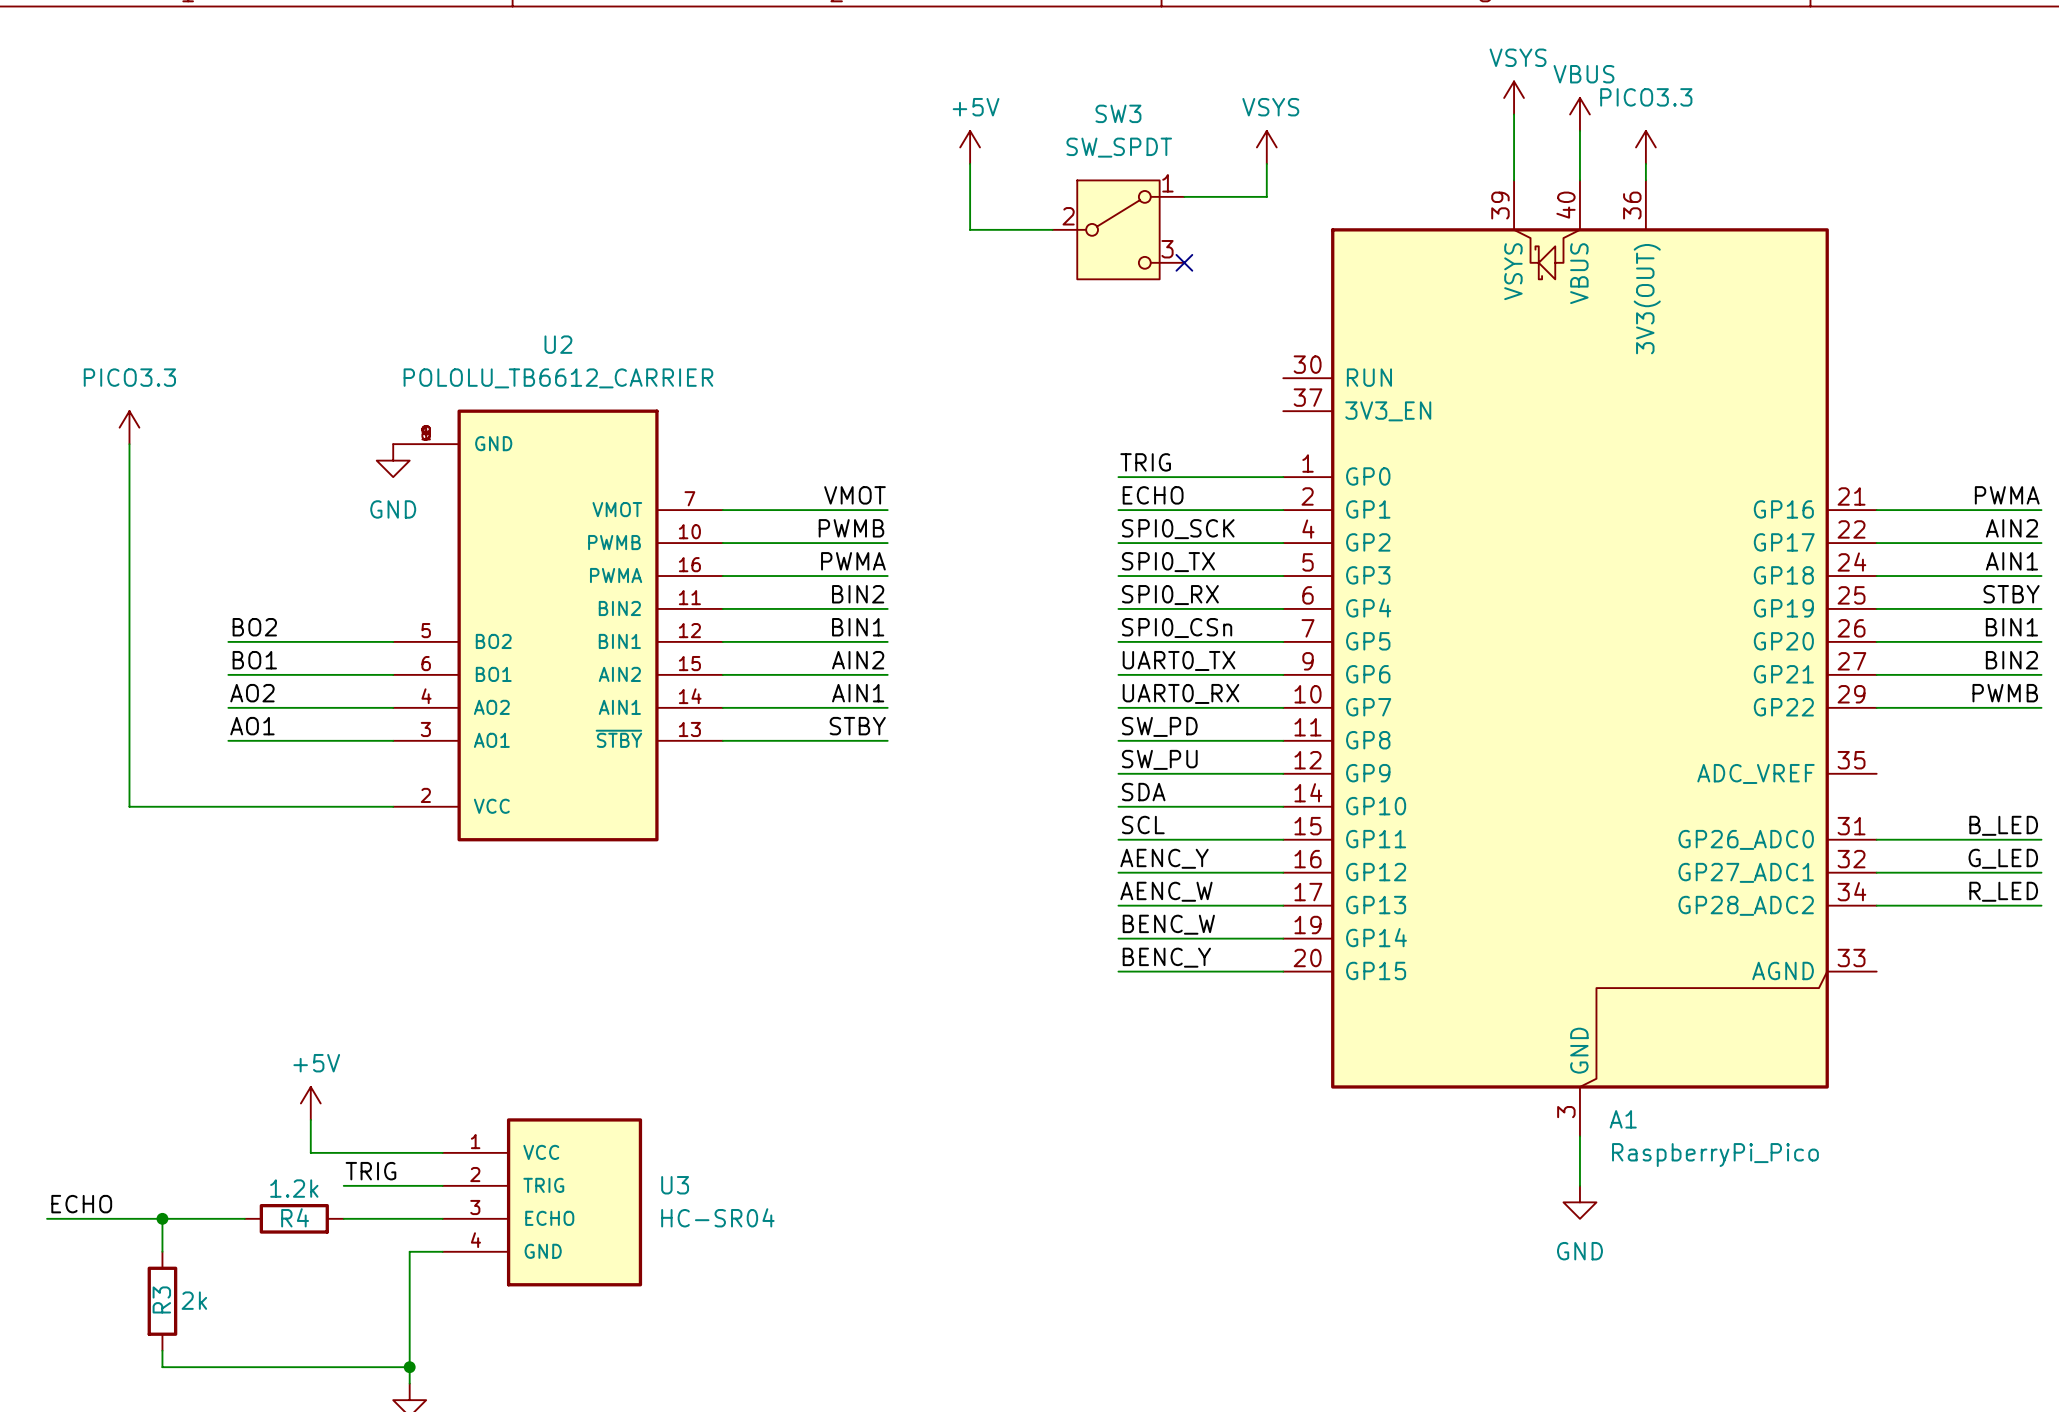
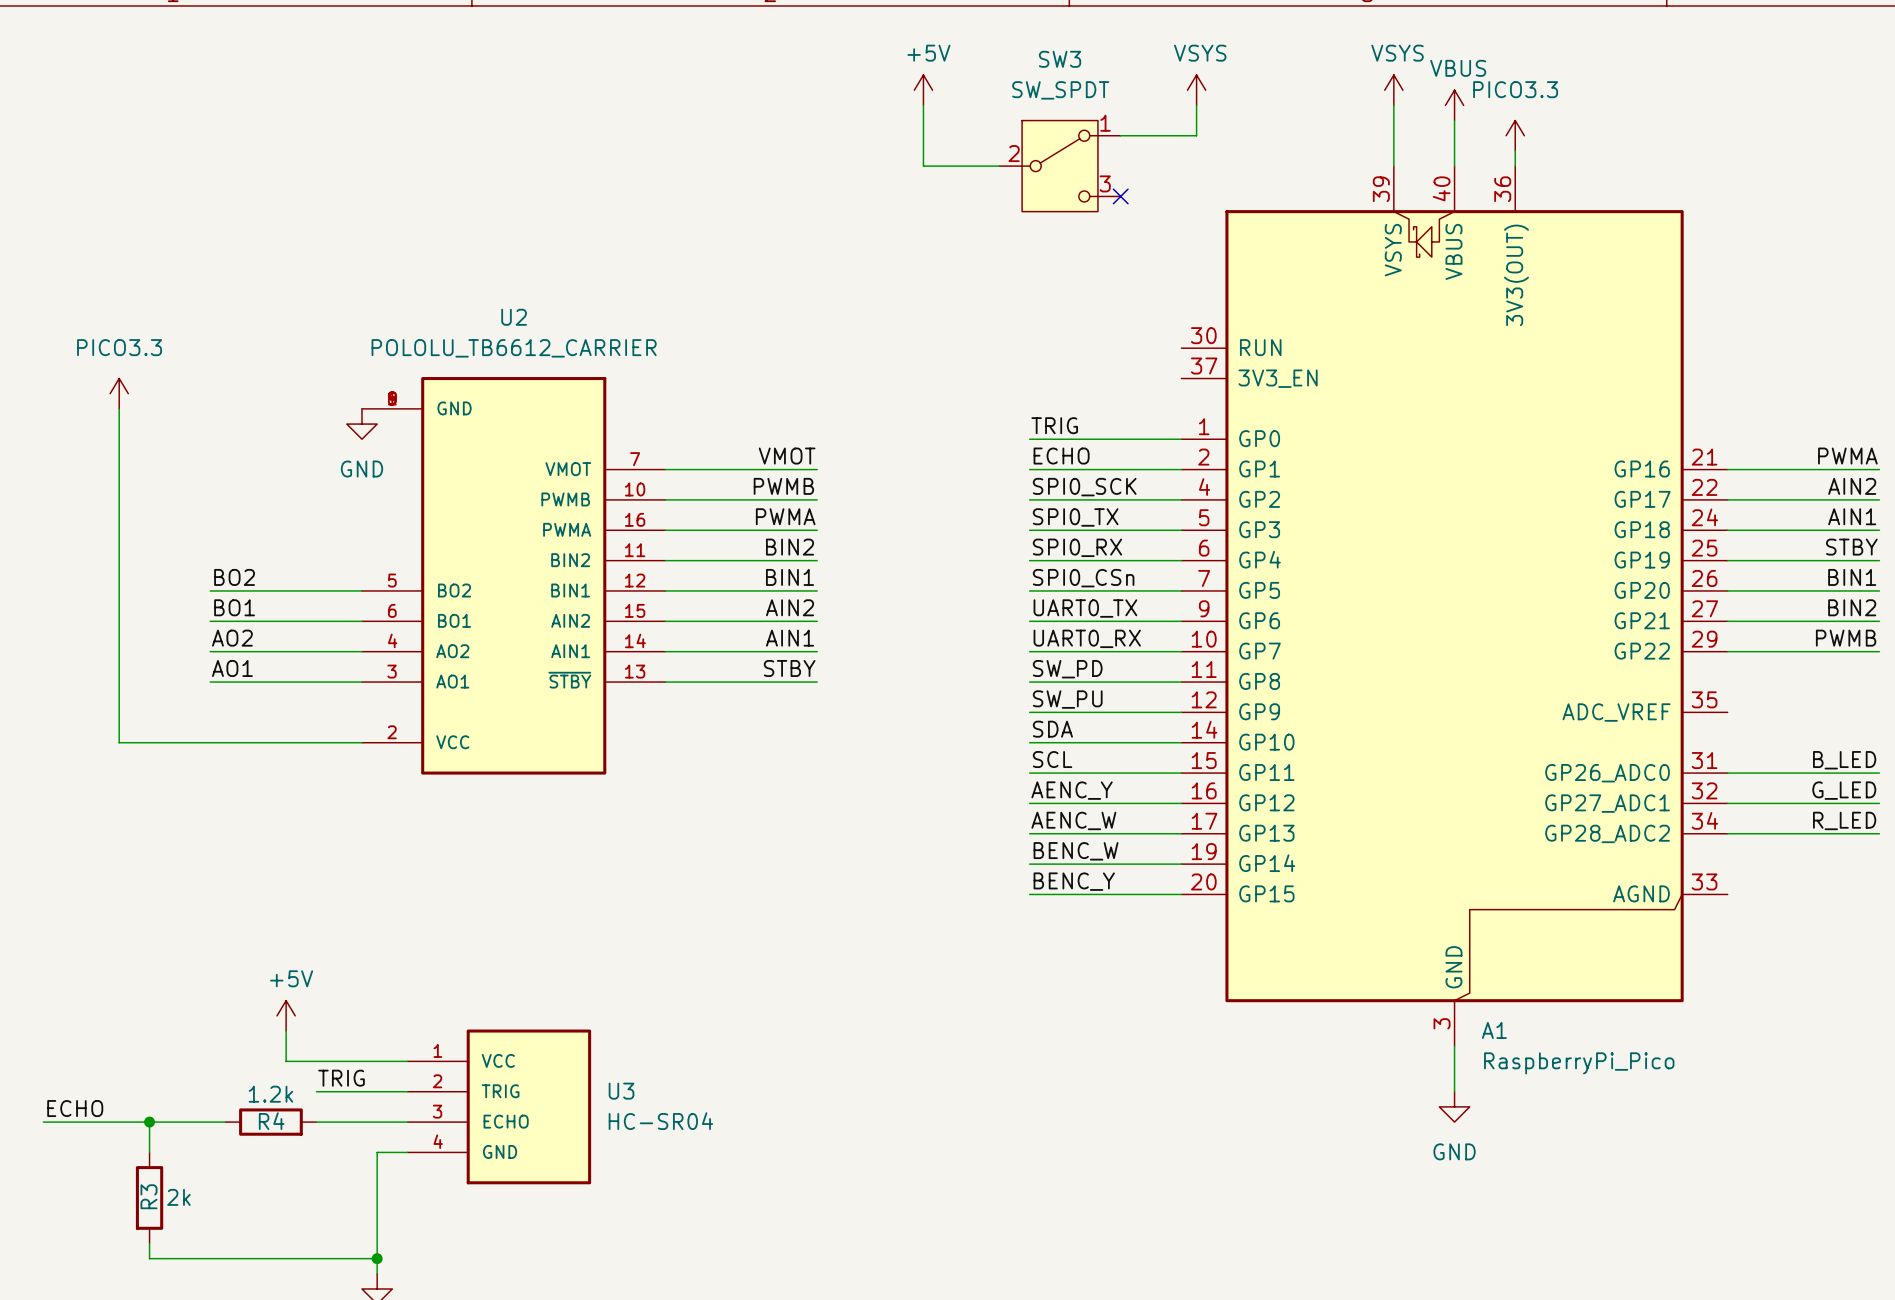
power symbol position: +5V (970, 147) -> +5V (923, 90)
power symbol position: VSYS (1266, 147) -> VSYS (1196, 90)
wire: (970, 163) (970, 229) (1052, 229) -> (923, 105) (923, 166) (999, 166)
wire: (1266, 163) (1266, 196) (1184, 196) -> (1196, 105) (1196, 135) (1120, 135)
SW3 position: (1118, 229) -> (1060, 166)
no-connect mark position: (1184, 262) -> (1120, 196)

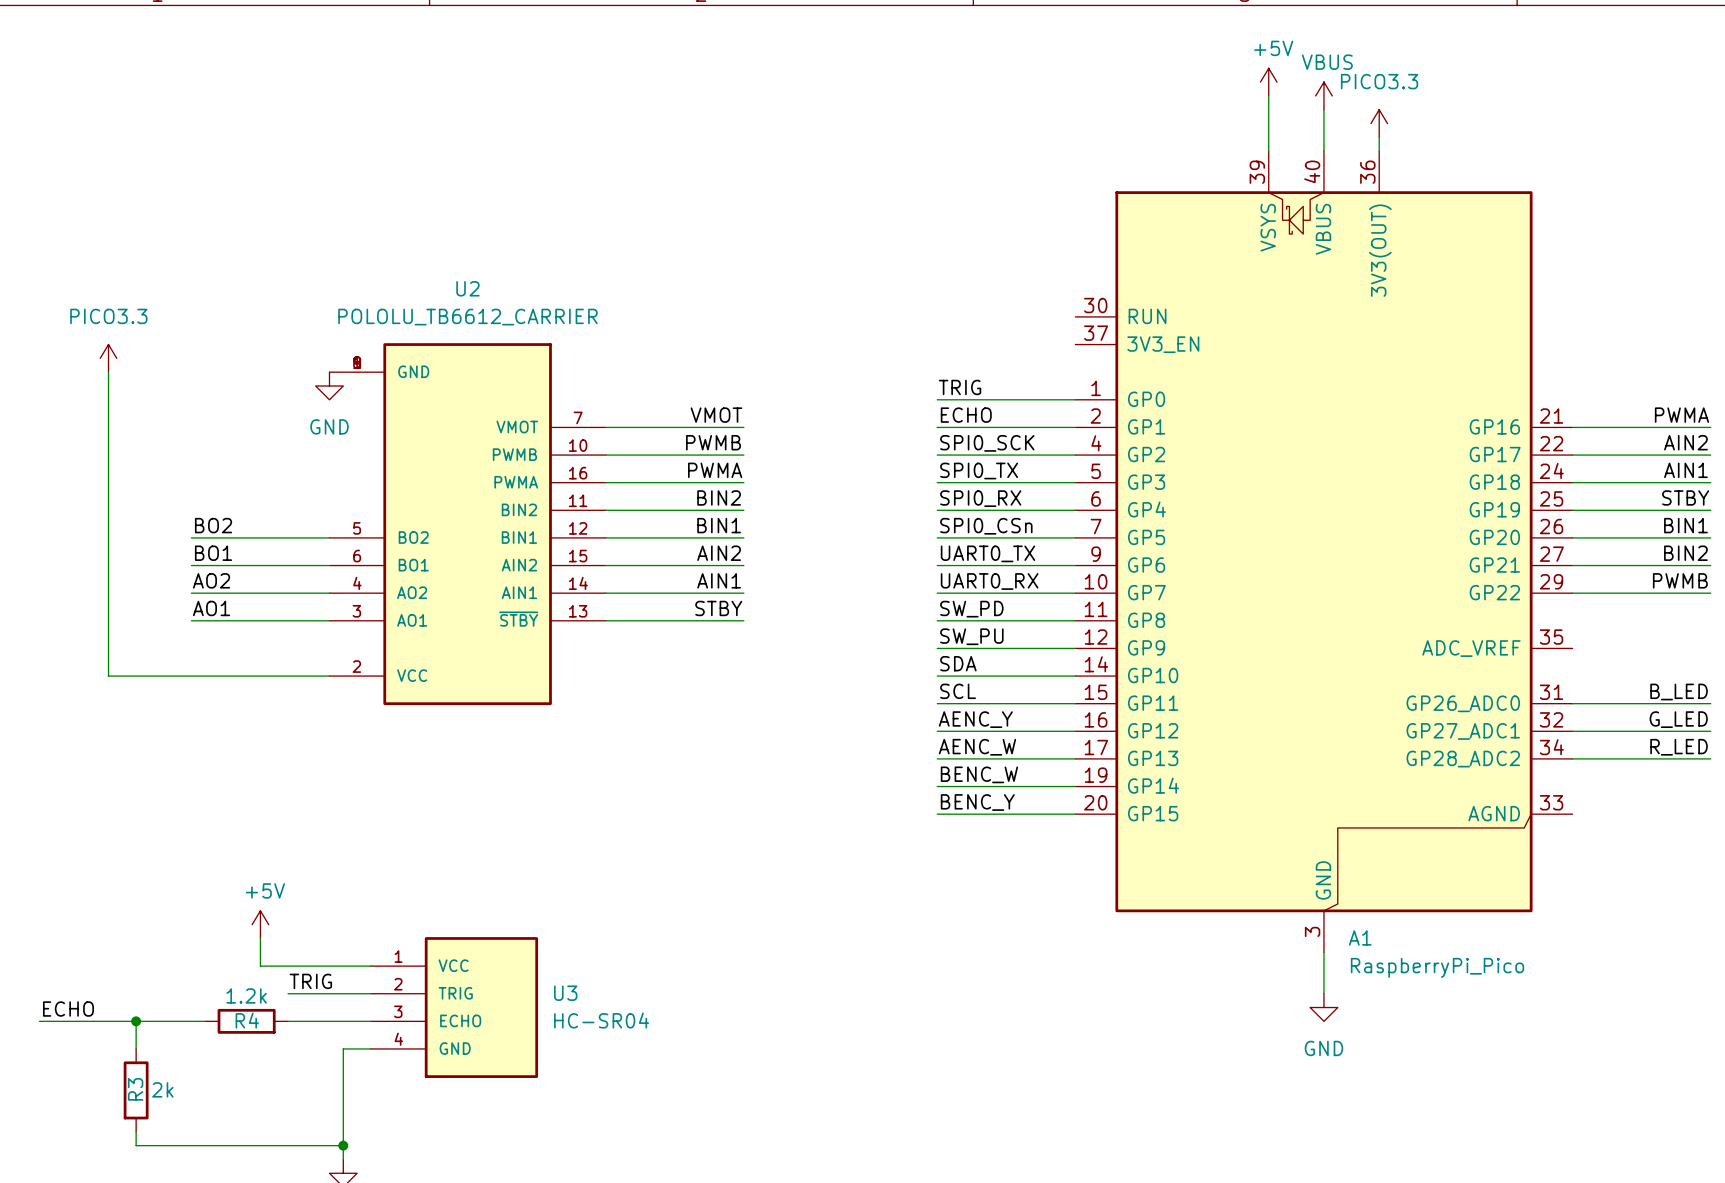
power symbol: +5V (923, 90) -> none
power symbol: VSYS (1196, 90) -> none
power symbol: VSYS (1393, 90) -> +5V (1268, 82)
wire: (923, 105) (923, 166) (999, 166) -> none
wire: (1196, 105) (1196, 135) (1120, 135) -> none
SW3: SW_SPDT (1060, 166) -> none
no-connect mark: (1120, 196) -> none

